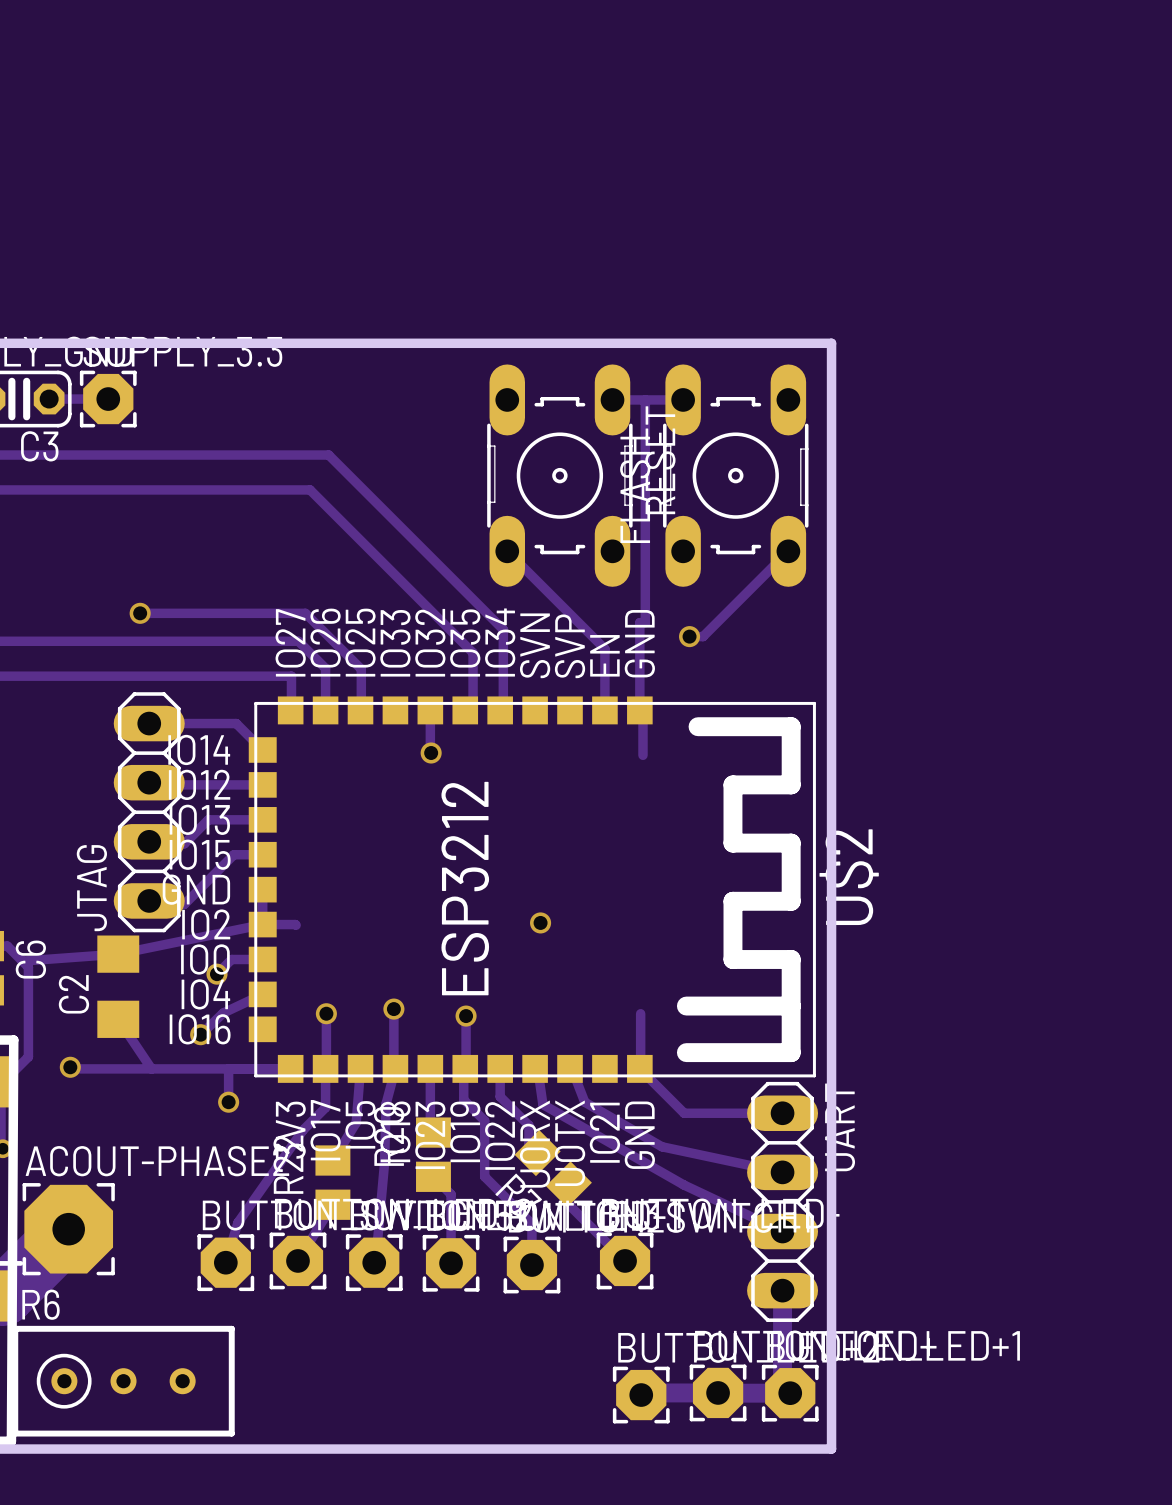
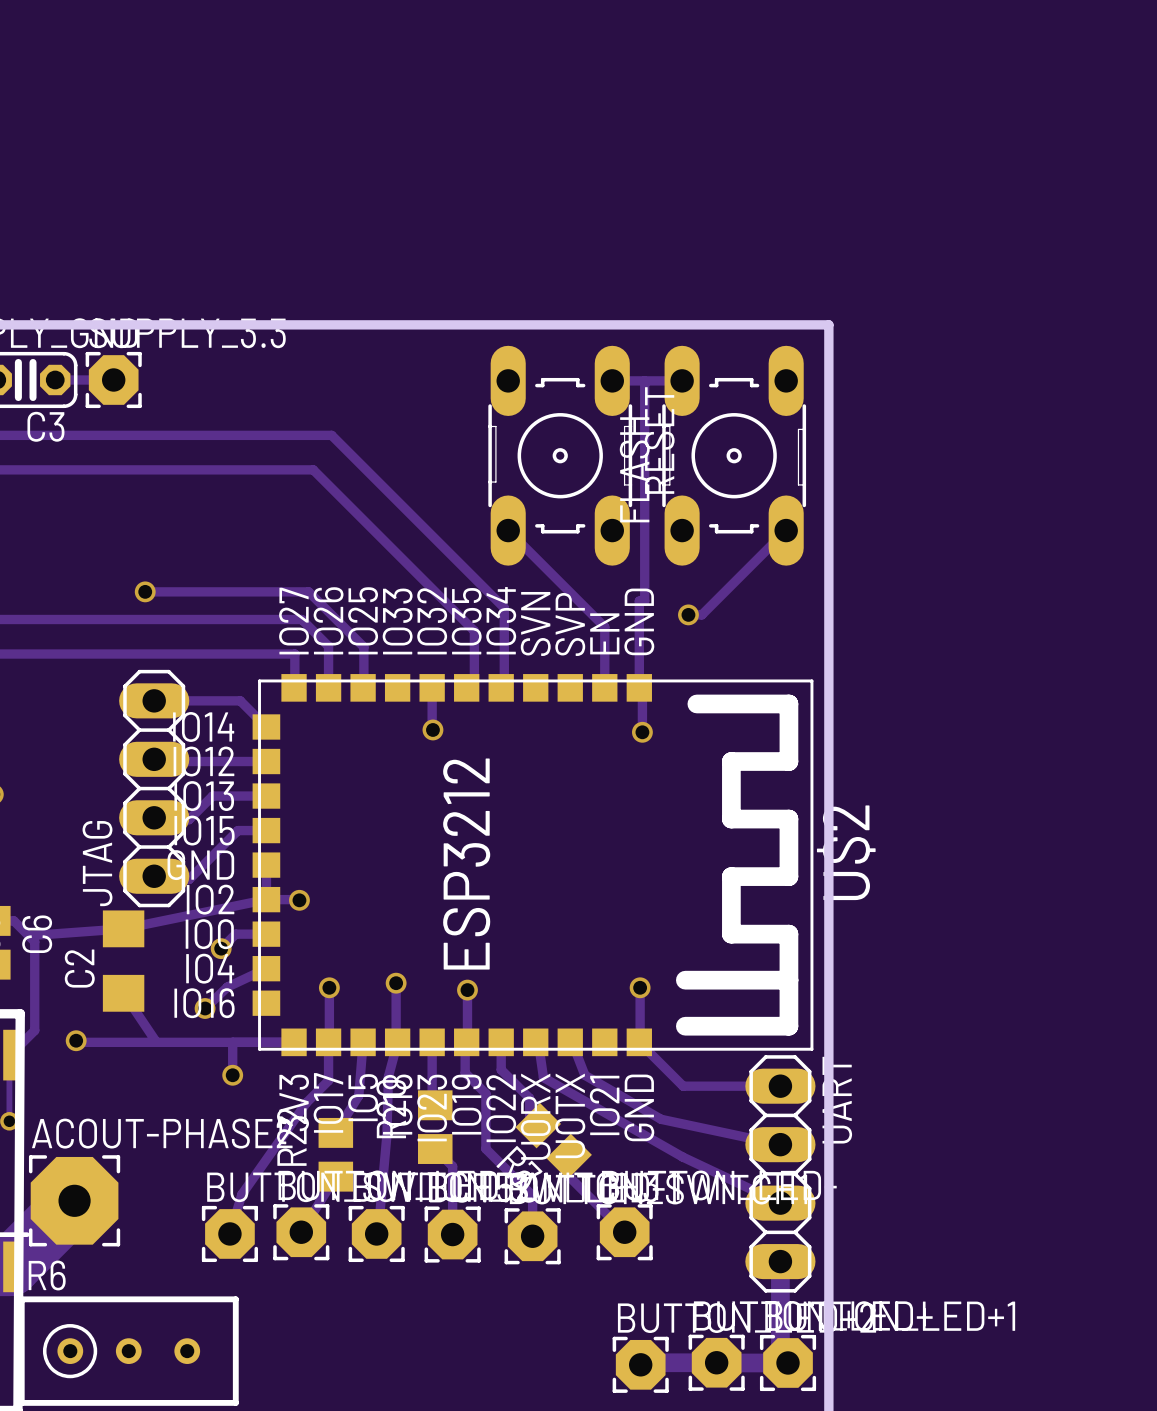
via: none -> (642, 732)
via: (540, 922) -> none
via: none -> (299, 900)
via: none -> (640, 987)

